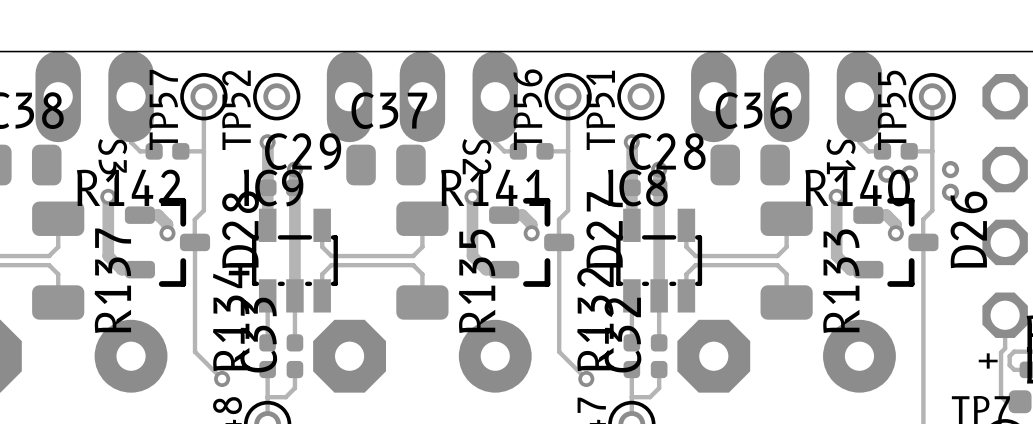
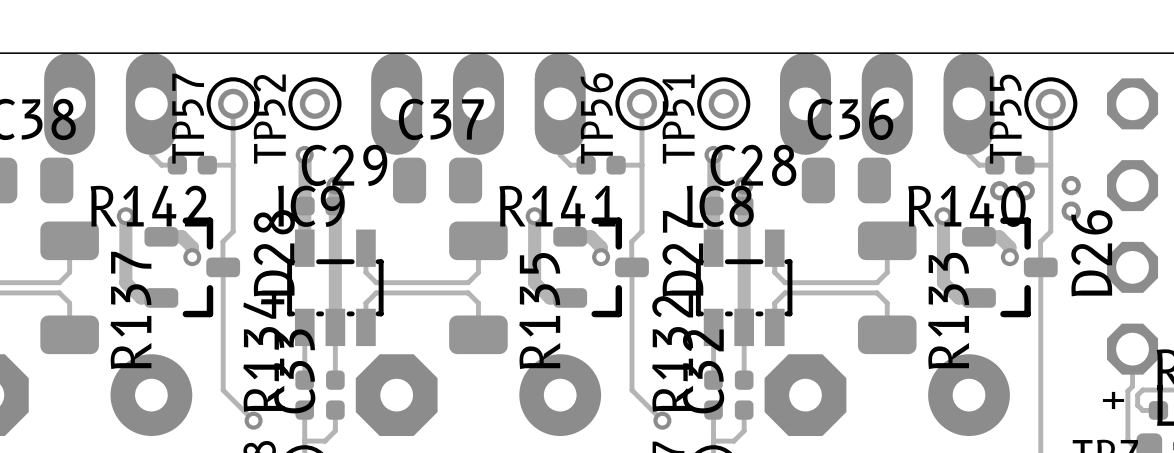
text: S3 (112, 156) -> none
text: S2 (476, 156) -> none
text: S1 (841, 156) -> none

